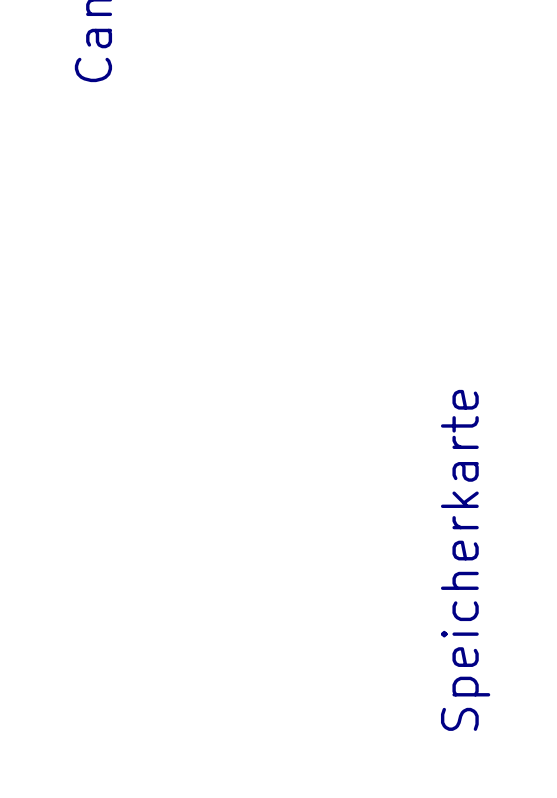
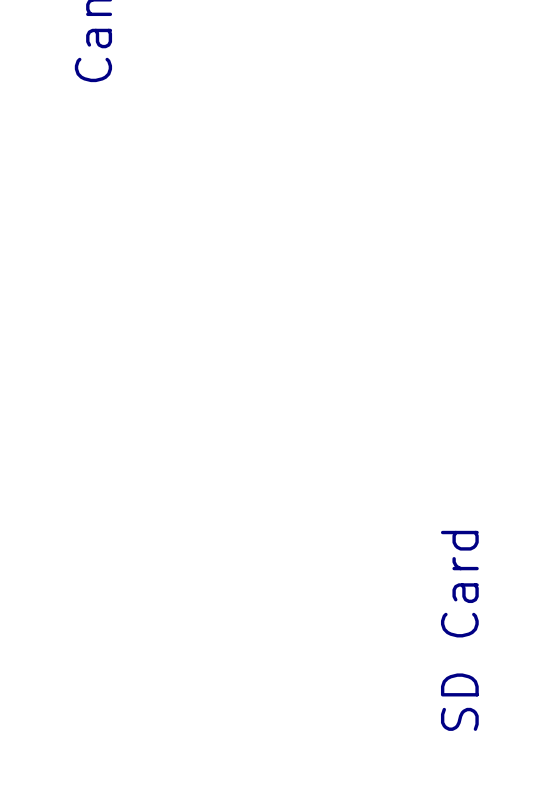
text: Speicherkarte (465, 560) -> SD Card (459, 630)

